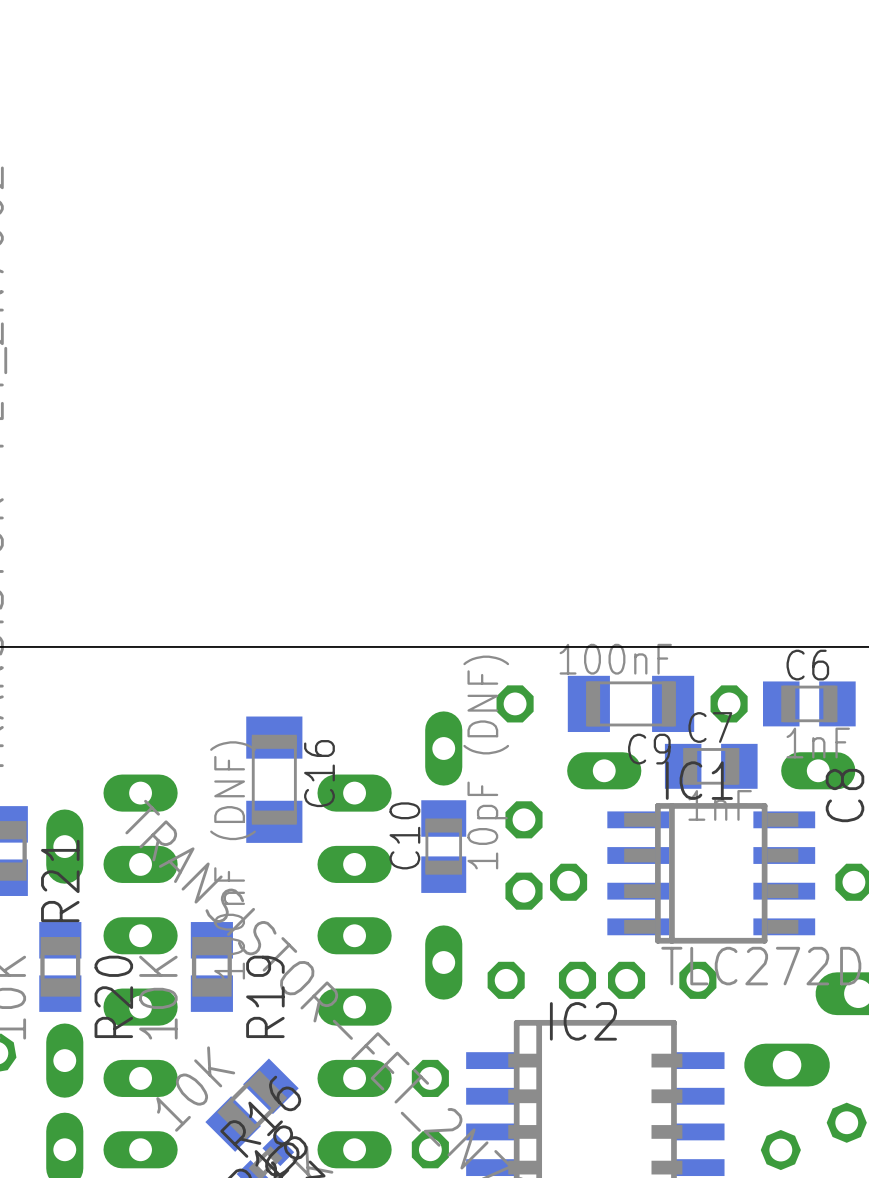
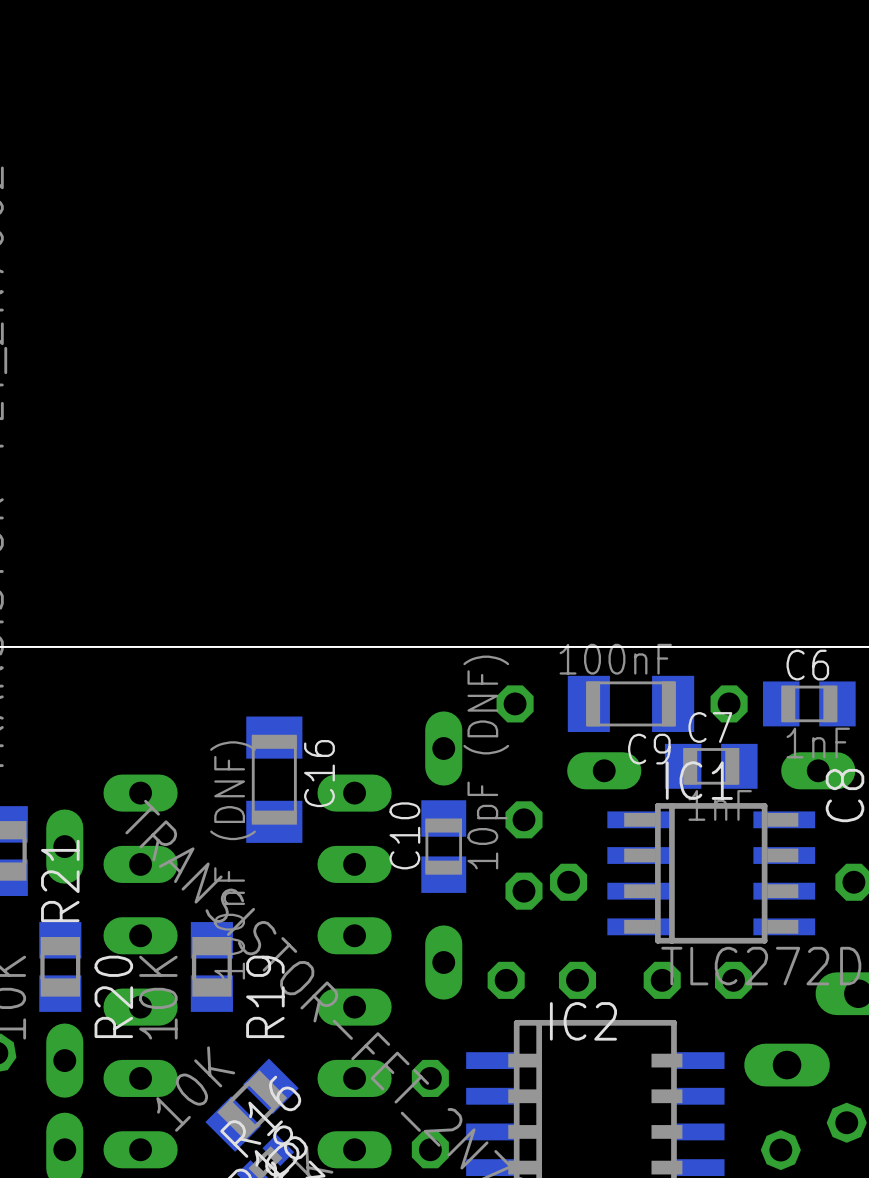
part position: (662, 980) -> (697, 980)

